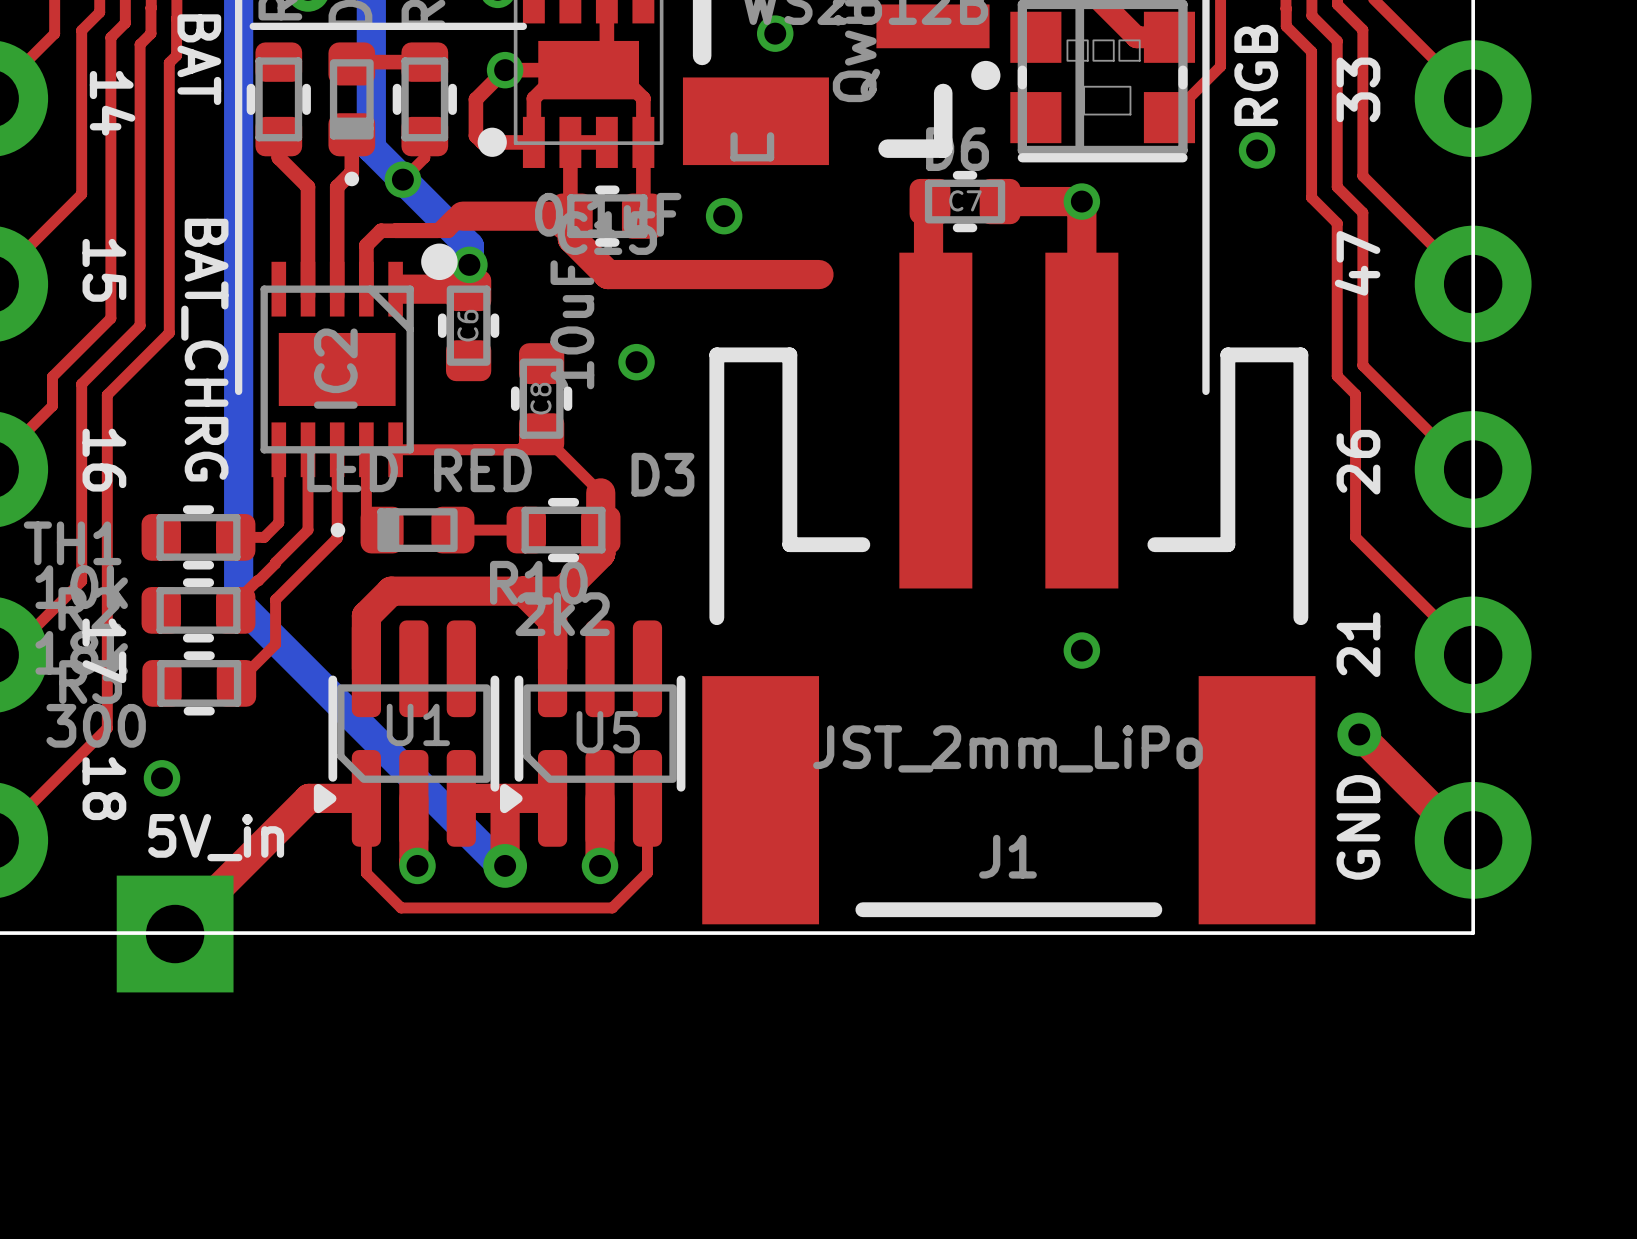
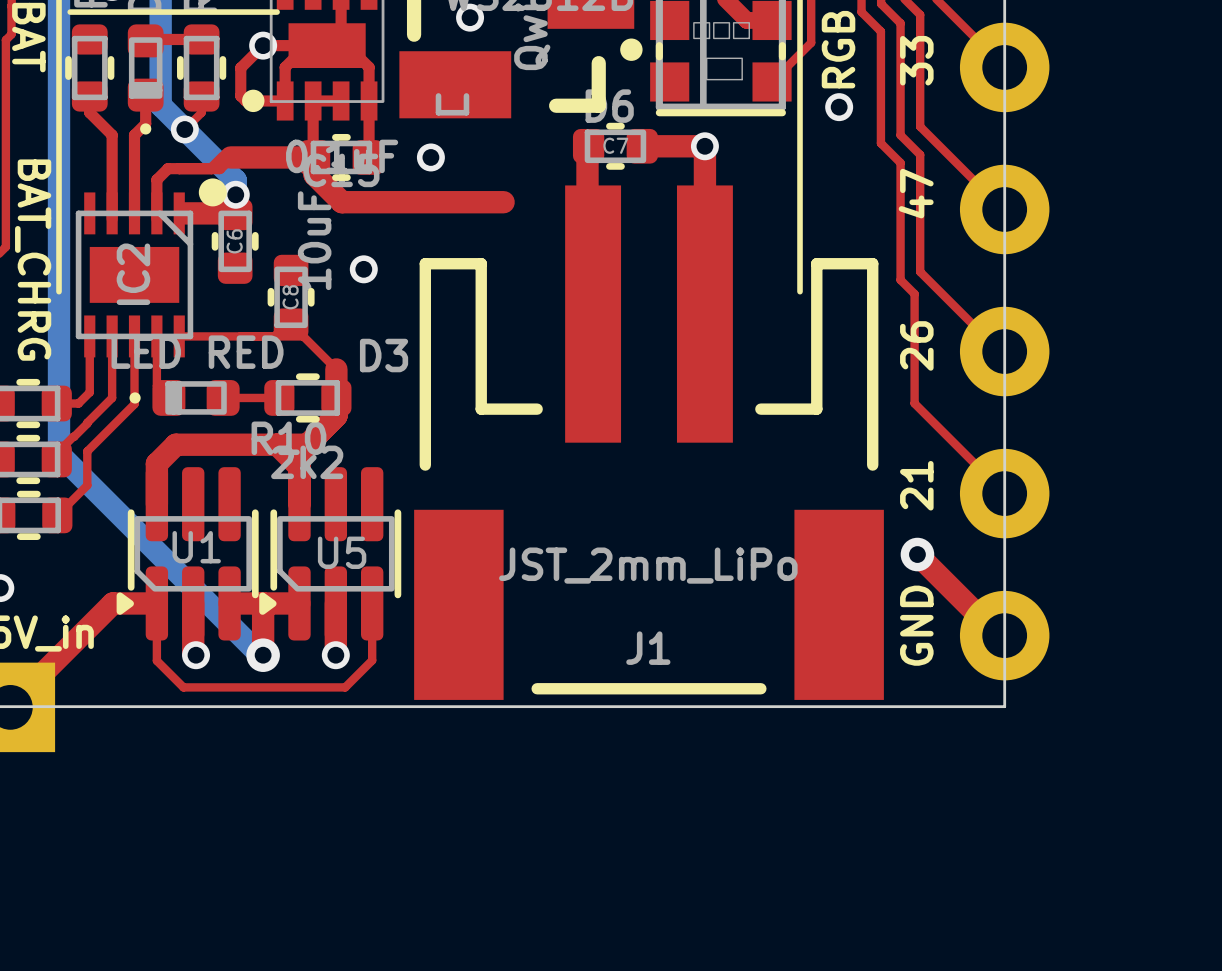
via: (1081, 650) -> none

